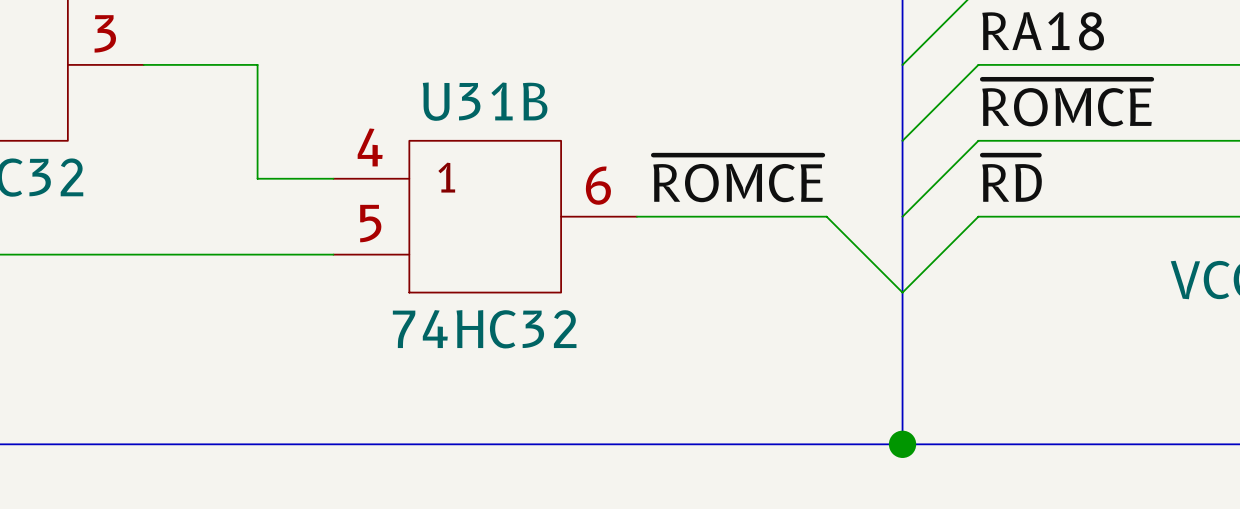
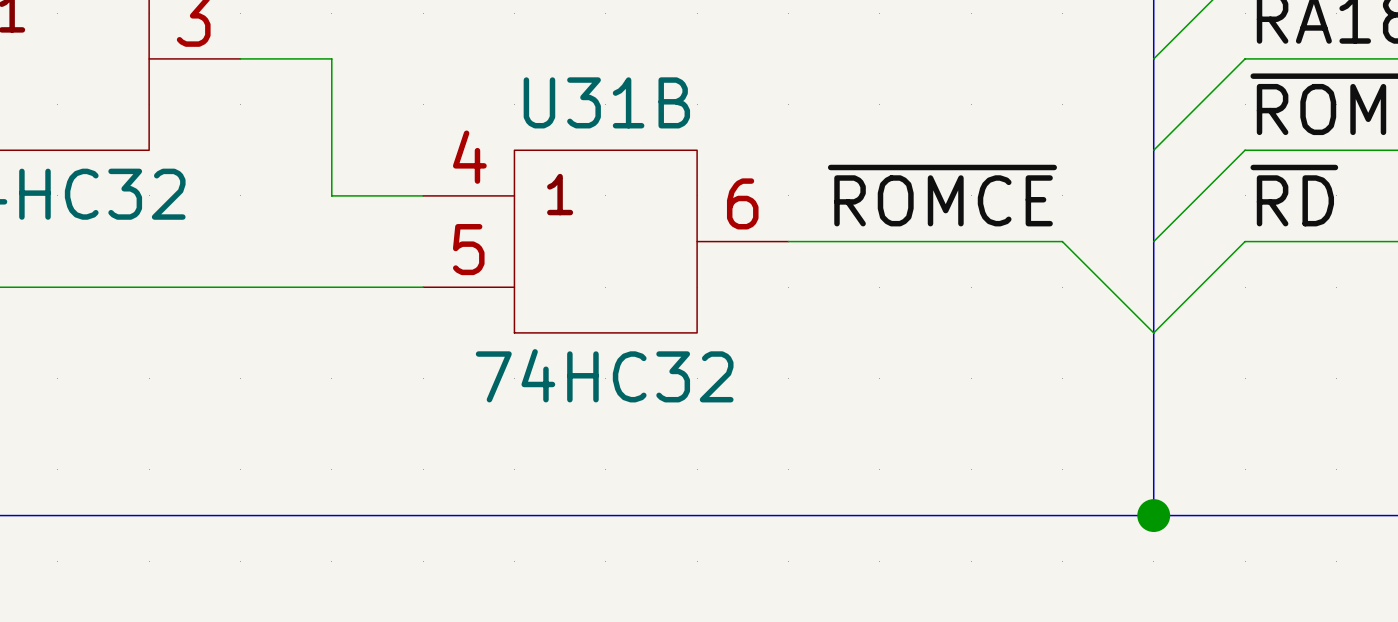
wire: (219, 64) (257, 64) (257, 178) -> (331, 58) (331, 195) (377, 195)
U31B position: (485, 216) -> (605, 241)

